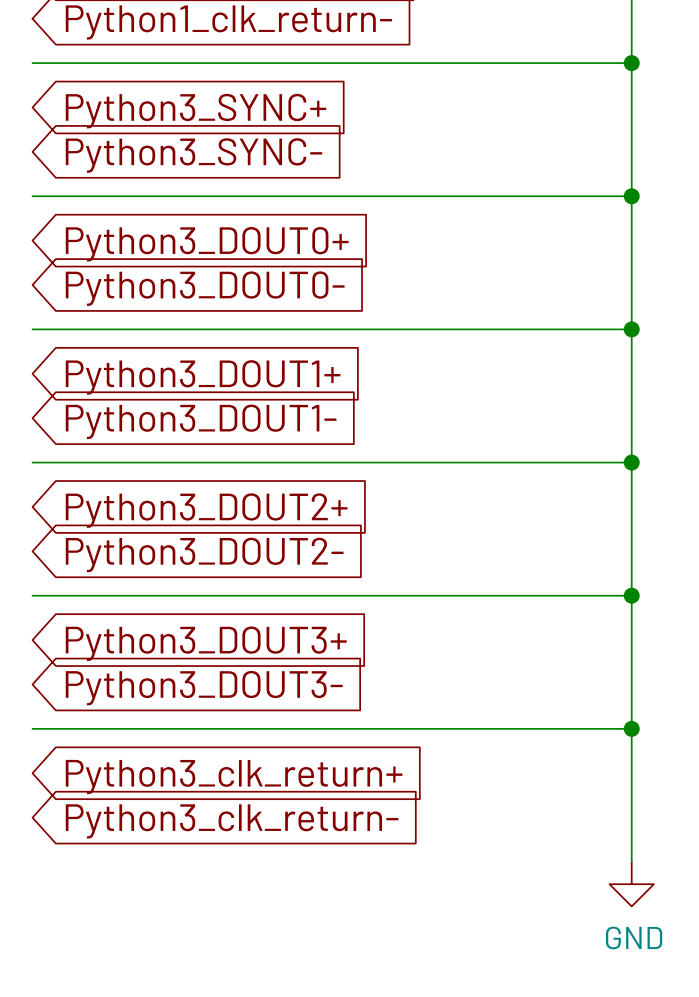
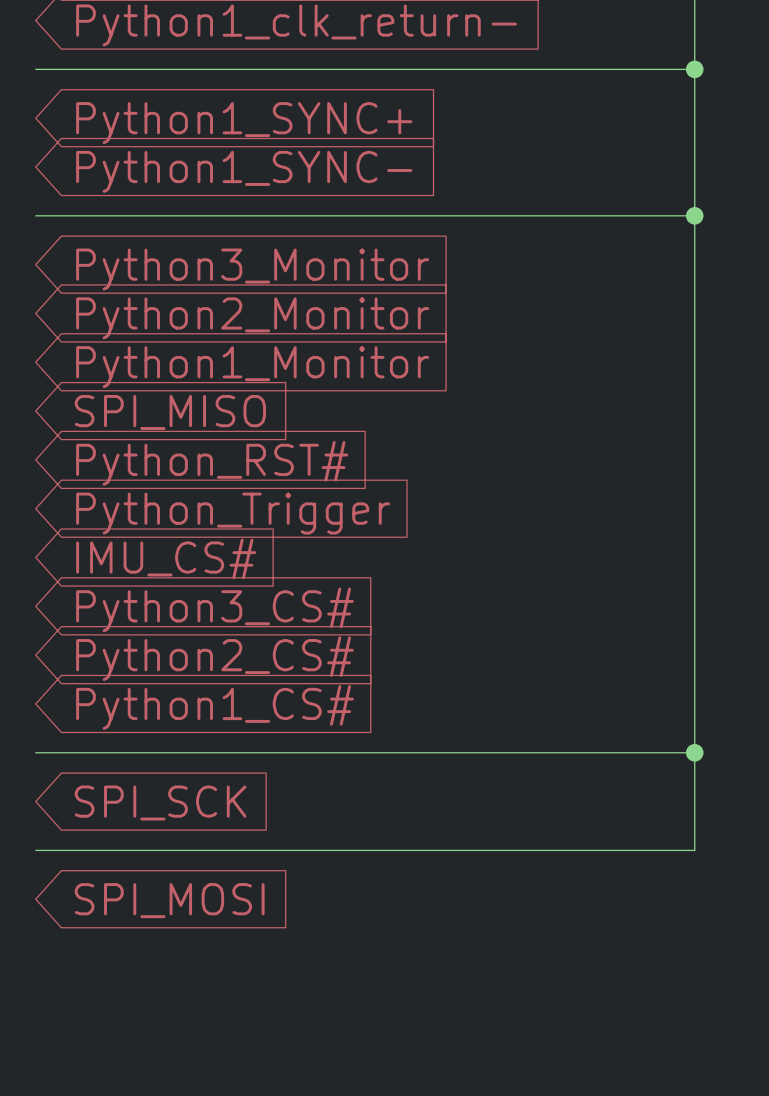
global label: Python3_SYNC+ (196, 111) -> Python1_SYNC+ (244, 123)
global label: Python3_SYNC- (194, 155) -> Python1_SYNC- (244, 171)
global label: Python3_DOUT0+ (207, 244) -> Python3_Monitor (252, 269)
global label: Python3_DOUT0- (205, 288) -> Python2_Monitor (252, 318)
wire: (32, 329) (631, 329) -> none
junction: (631, 329) -> none
global label: none -> Python1_Monitor (252, 367)
global label: Python3_DOUT1+ (203, 377) -> SPI_MISO (170, 412)
global label: Python3_DOUT1- (201, 421) -> Python_RST# (212, 463)
wire: (32, 462) (631, 462) -> none
junction: (631, 462) -> none
global label: none -> Python_Trigger (233, 513)
global label: Python3_DOUT2+ (206, 510) -> IMU_CS# (166, 558)
global label: Python3_DOUT2- (204, 554) -> Python3_CS# (214, 609)
wire: (32, 595) (631, 595) -> none
junction: (631, 595) -> none
global label: none -> Python2_CS# (214, 658)
global label: Python3_DOUT3+ (206, 643) -> Python1_CS# (214, 707)
junction: none -> (694, 752)
global label: Python3_DOUT3- (204, 688) -> none
wire: (32, 728) (631, 728) -> (35, 752) (694, 752)
global label: none -> SPI_SCK (160, 802)
junction: (631, 728) -> none
wire: (631, 773) (631, 862) -> (694, 850) (35, 850)
global label: Python3_clk_return+ (234, 777) -> none
global label: Python3_clk_return- (232, 821) -> SPI_MOSI (169, 900)
power symbol: GND (631, 884) -> none

